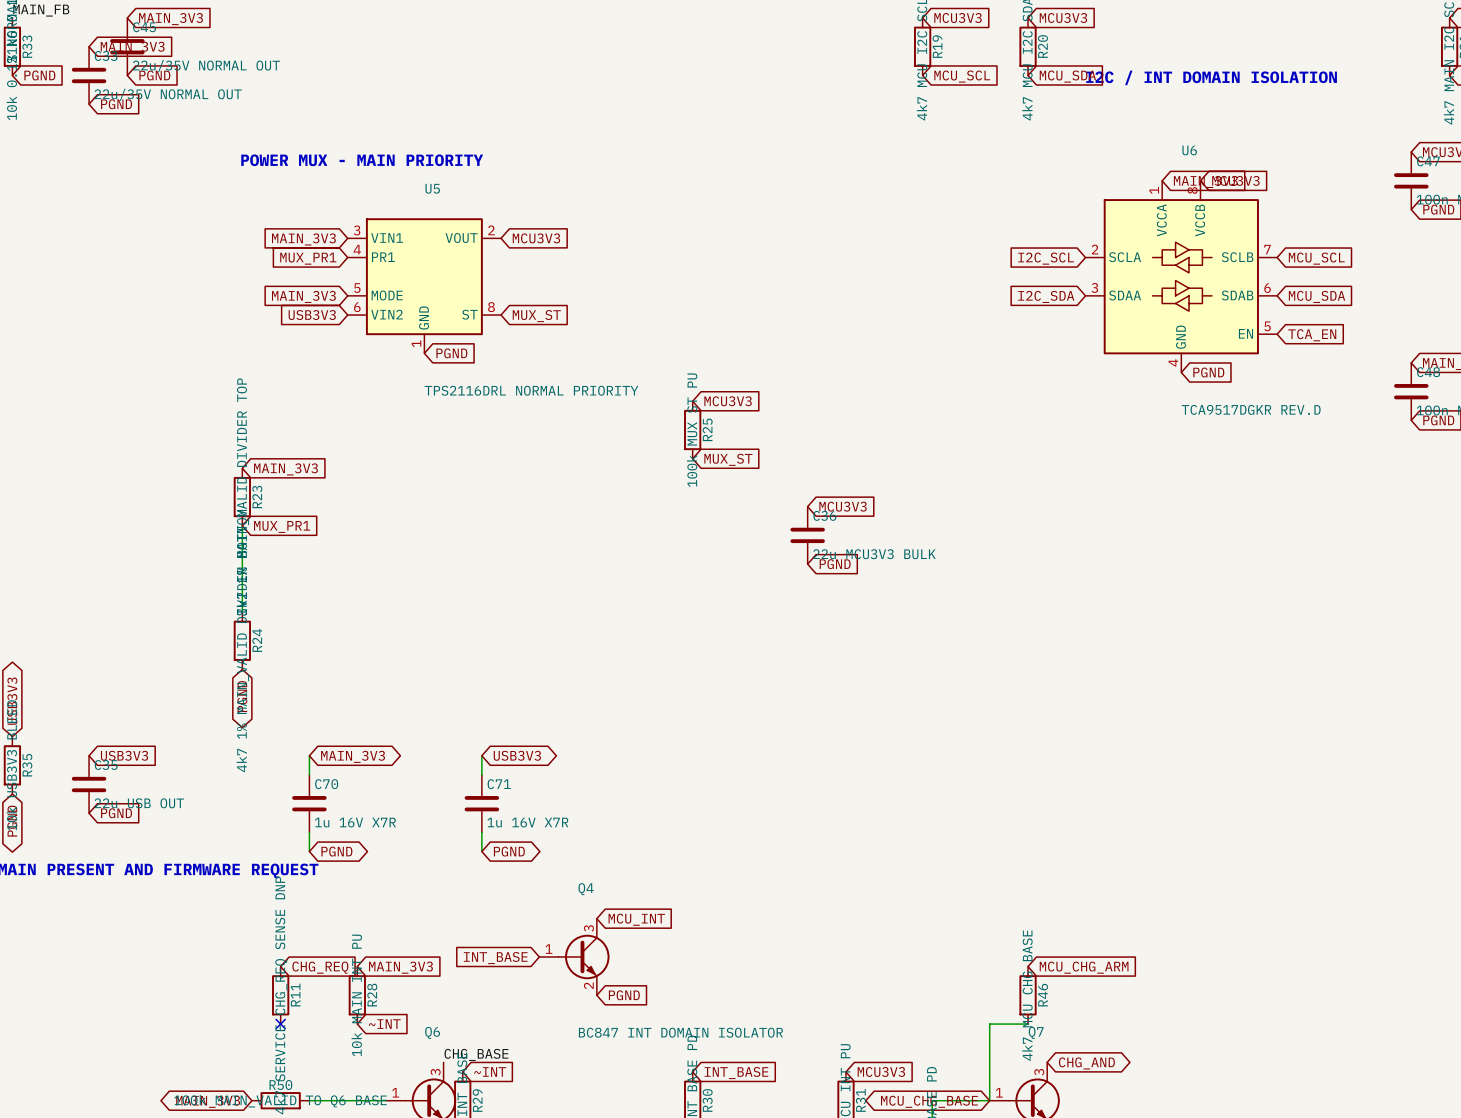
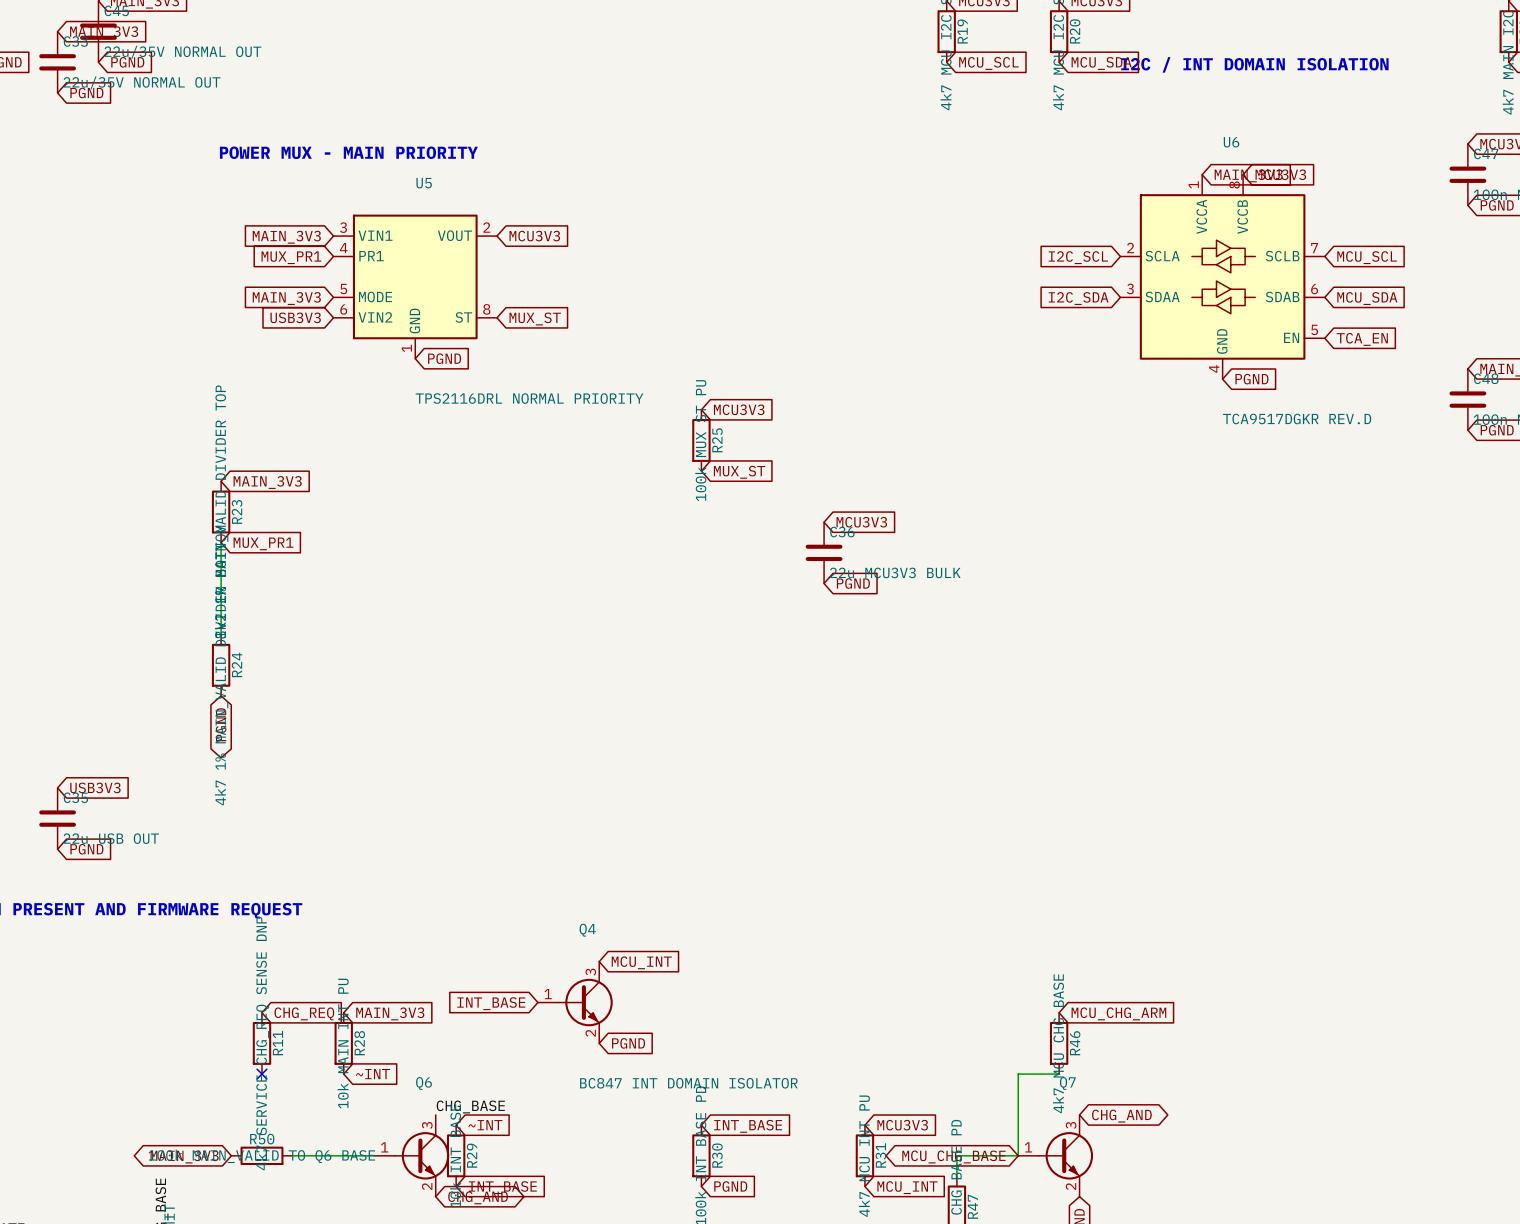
wire: (309, 755) (309, 774) -> none
wire: (481, 755) (481, 774) -> none
global label: USB3V3 (517, 755) -> none
global label: MAIN_3V3 (353, 756) -> none
C70: 1u 16V X7R (309, 803) -> none
C71: 1u 16V X7R (481, 803) -> none
wire: (309, 832) (309, 851) -> none
wire: (481, 832) (481, 851) -> none
global label: PGND (336, 851) -> none
global label: PGND (509, 851) -> none

